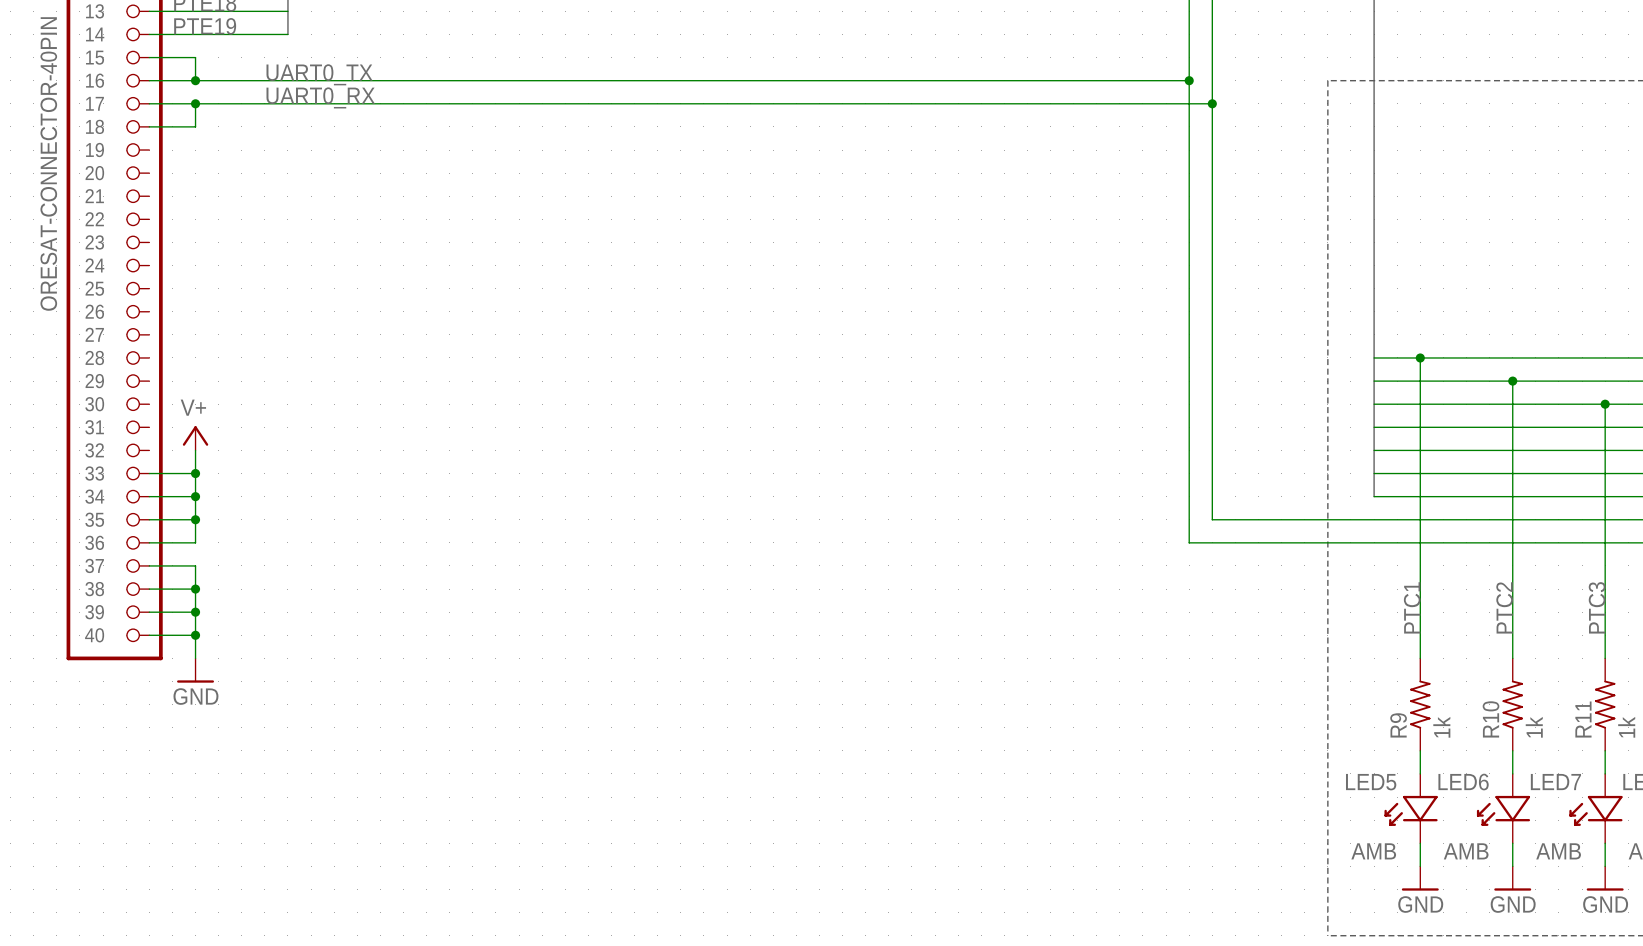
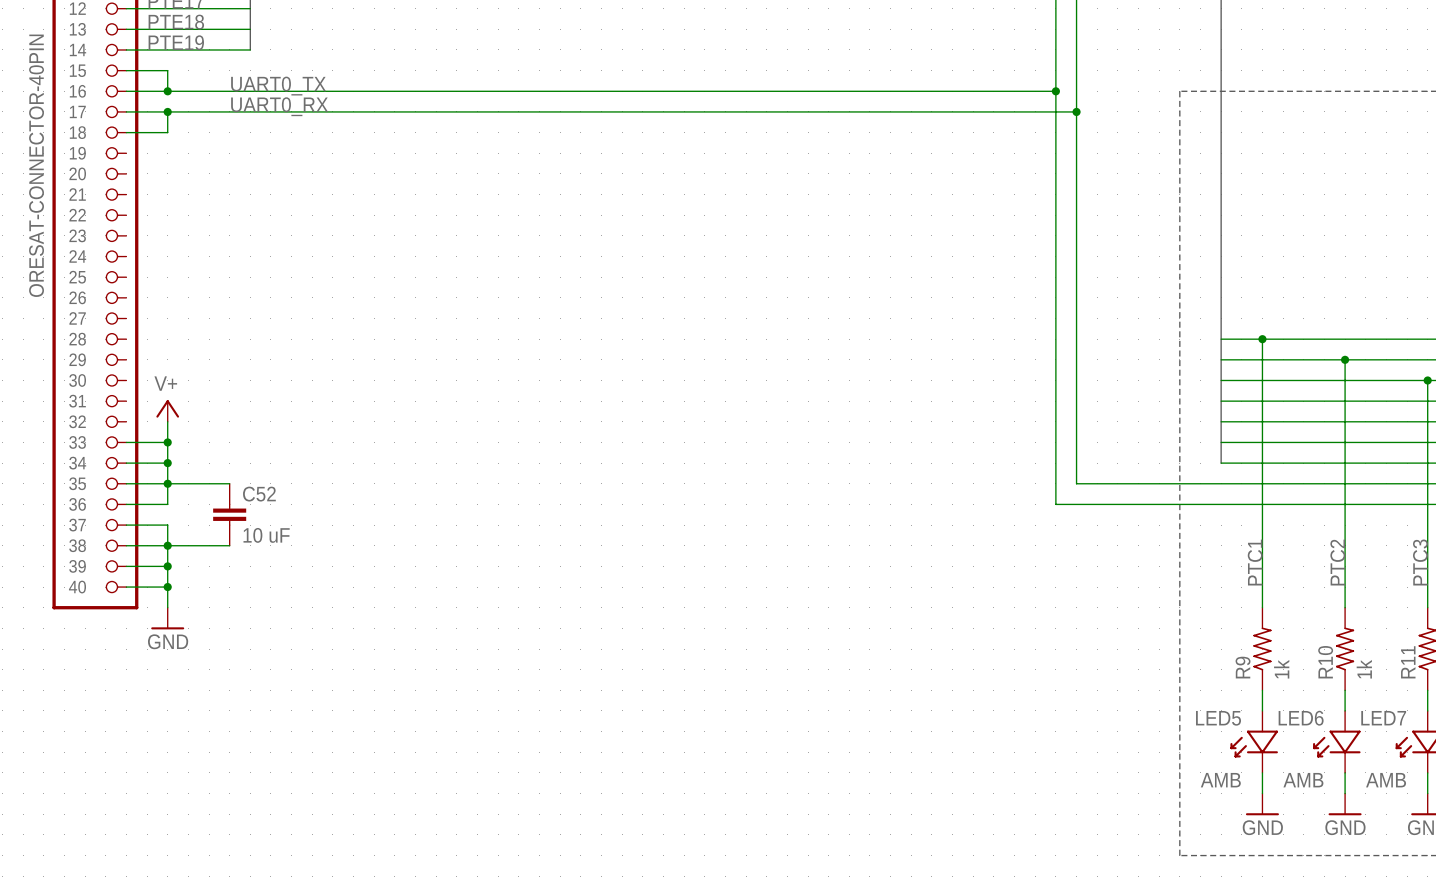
wire: none -> (167, 483) (229, 483)
C52: none -> 10 uF (229, 514)
wire: none -> (167, 545) (229, 545)

